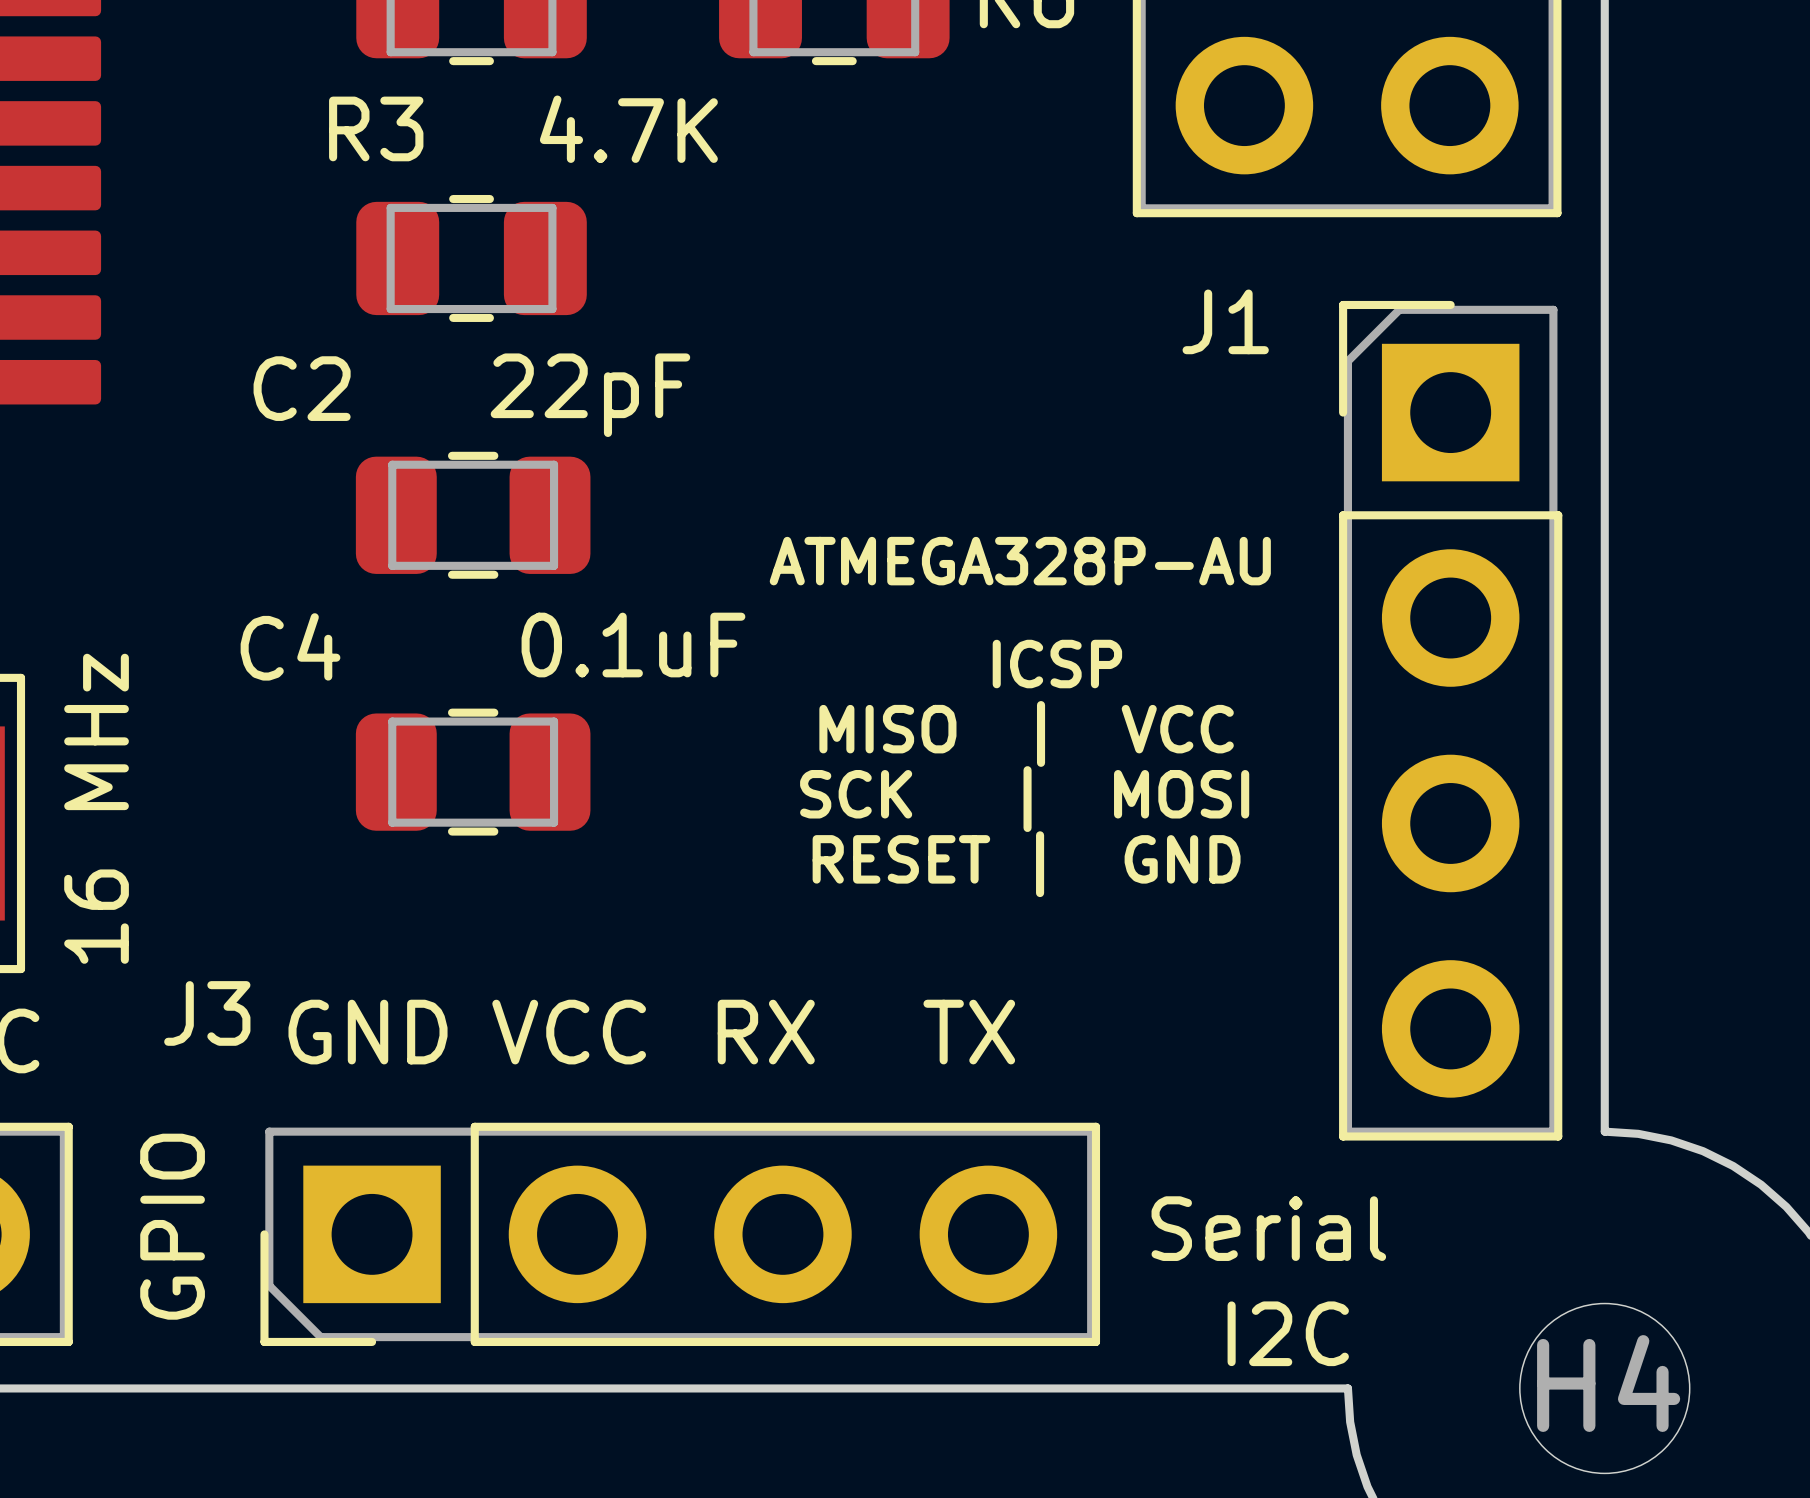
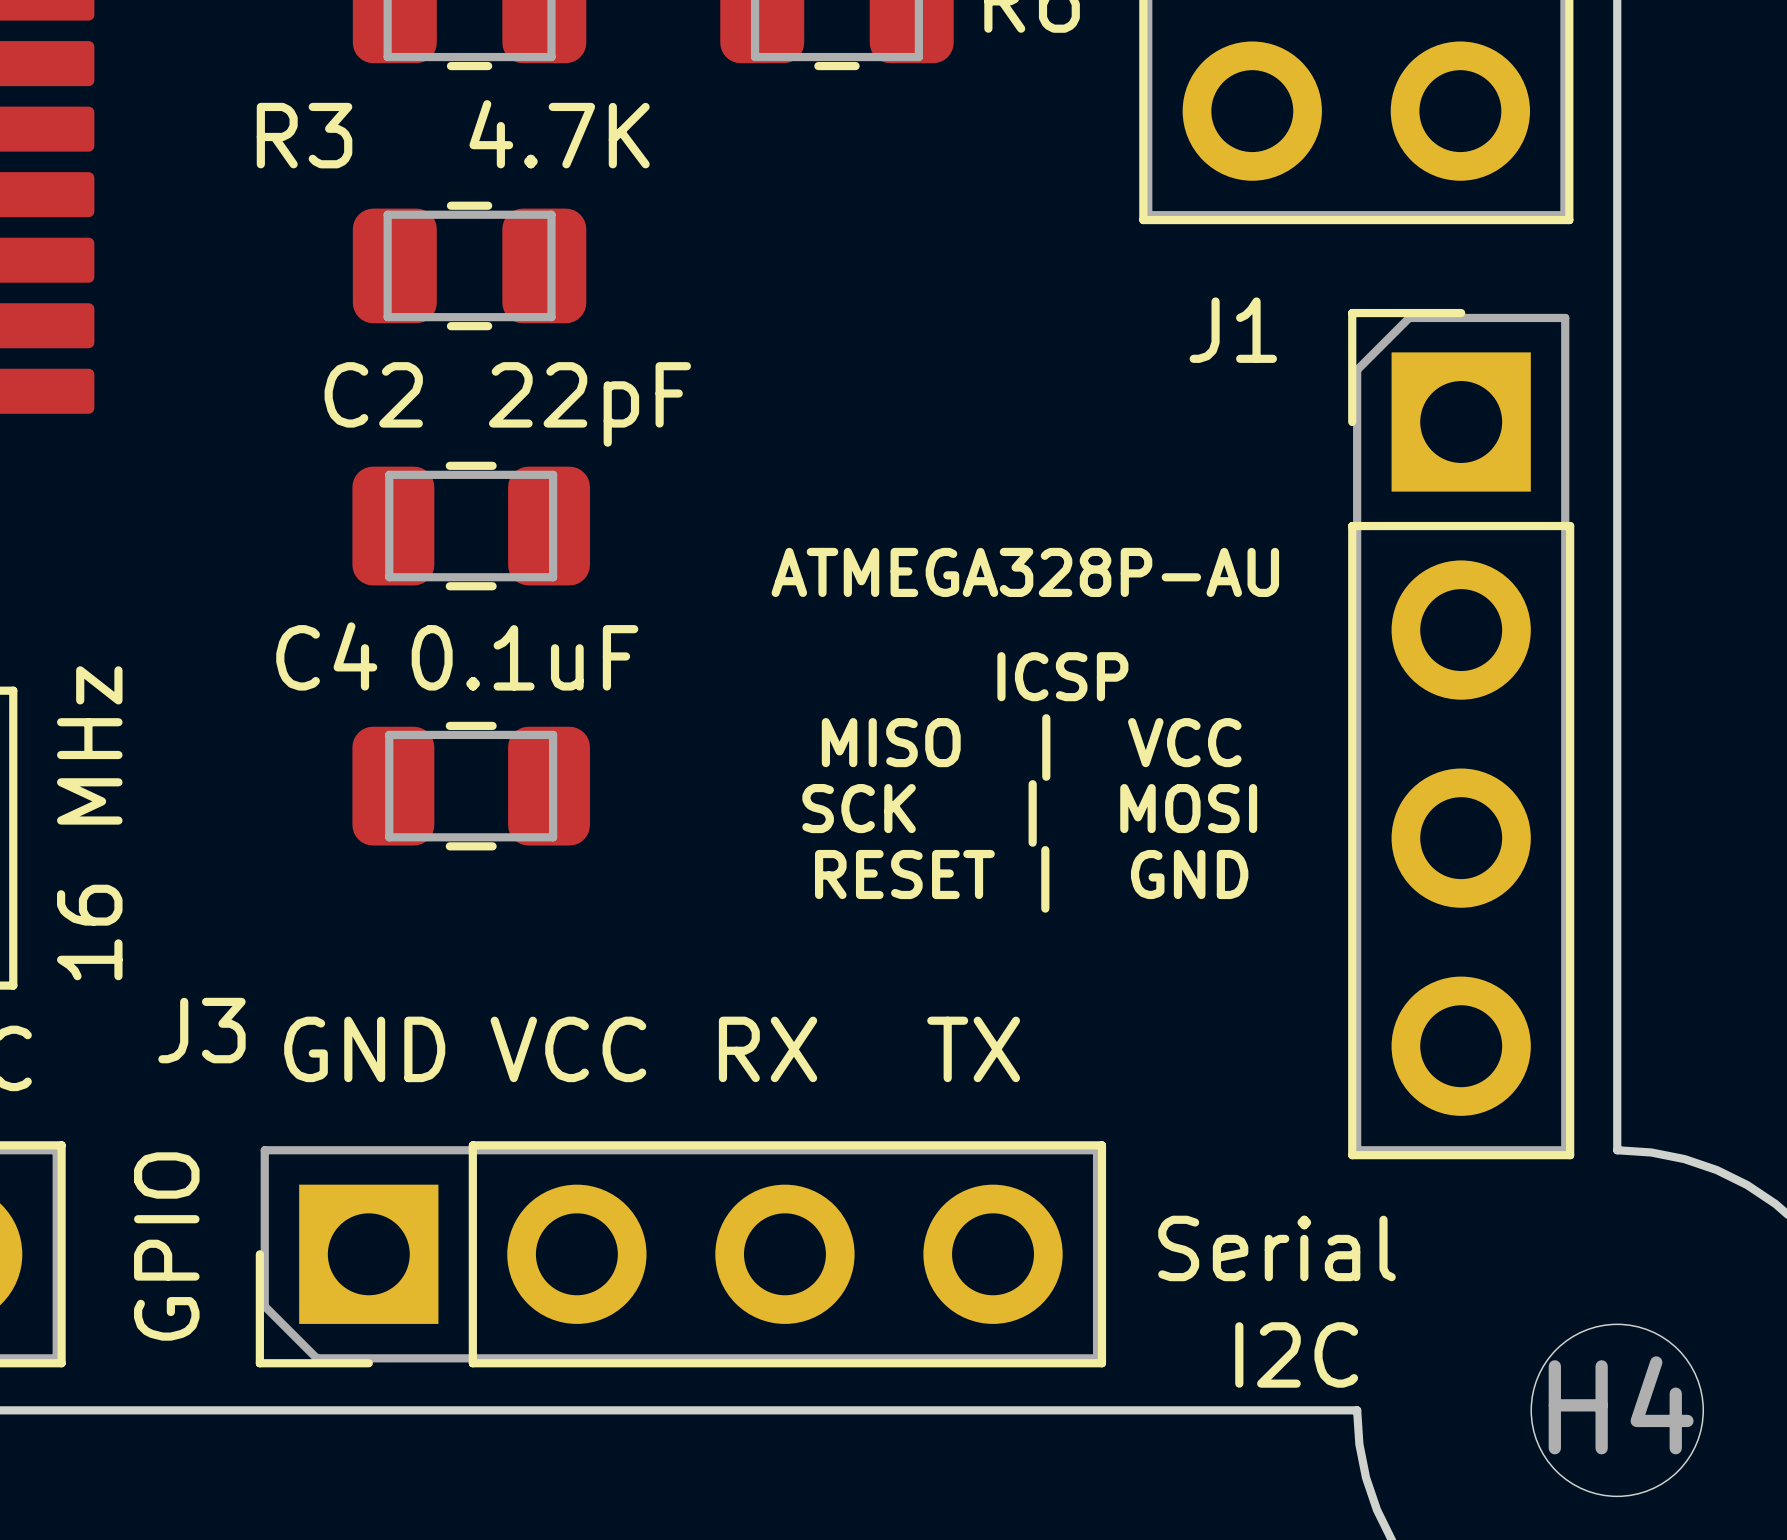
R3 name position: R3 (376, 128) -> R3 (304, 135)
R3 value position: 4.7K (628, 129) -> 4.7K (559, 134)
C2 name position: C2 (302, 388) -> C2 (373, 394)
C4 value position: 0.1uF (633, 645) -> 0.1uF (525, 657)
C4 name position: C4 (290, 646) -> C4 (326, 656)

